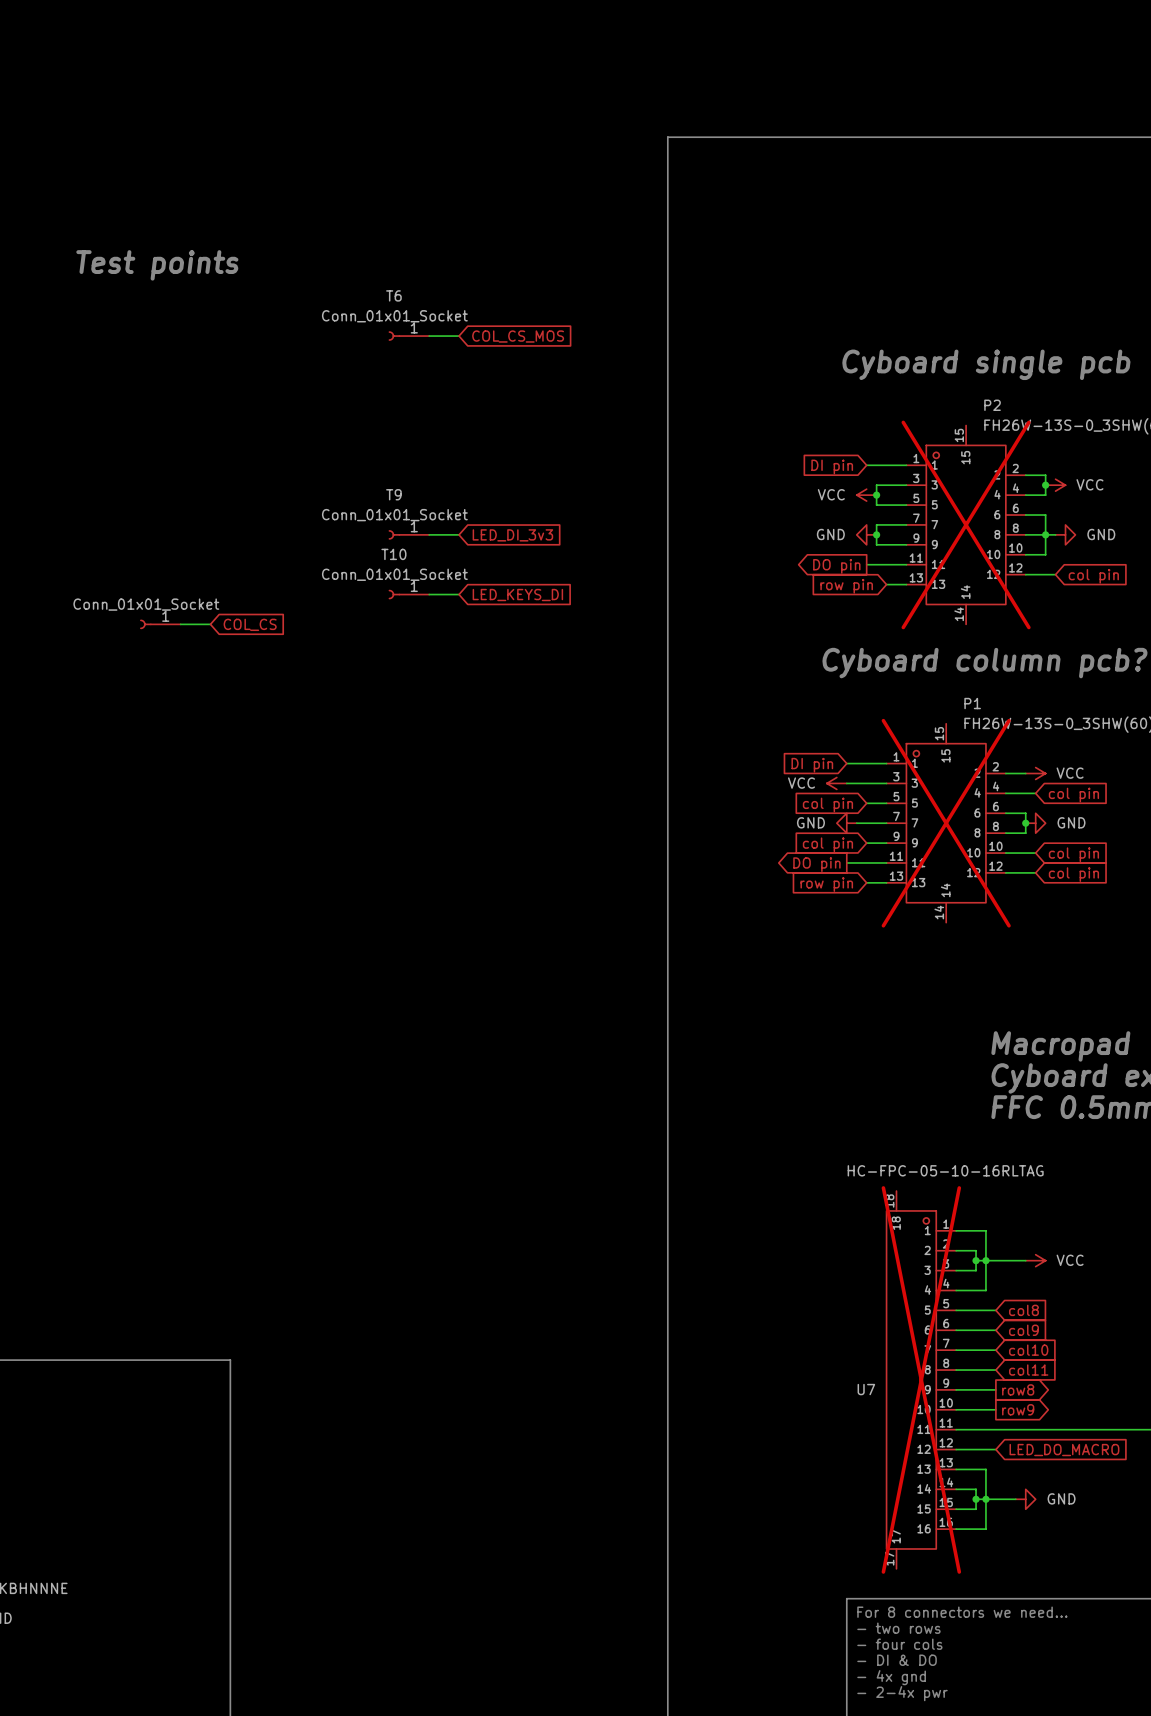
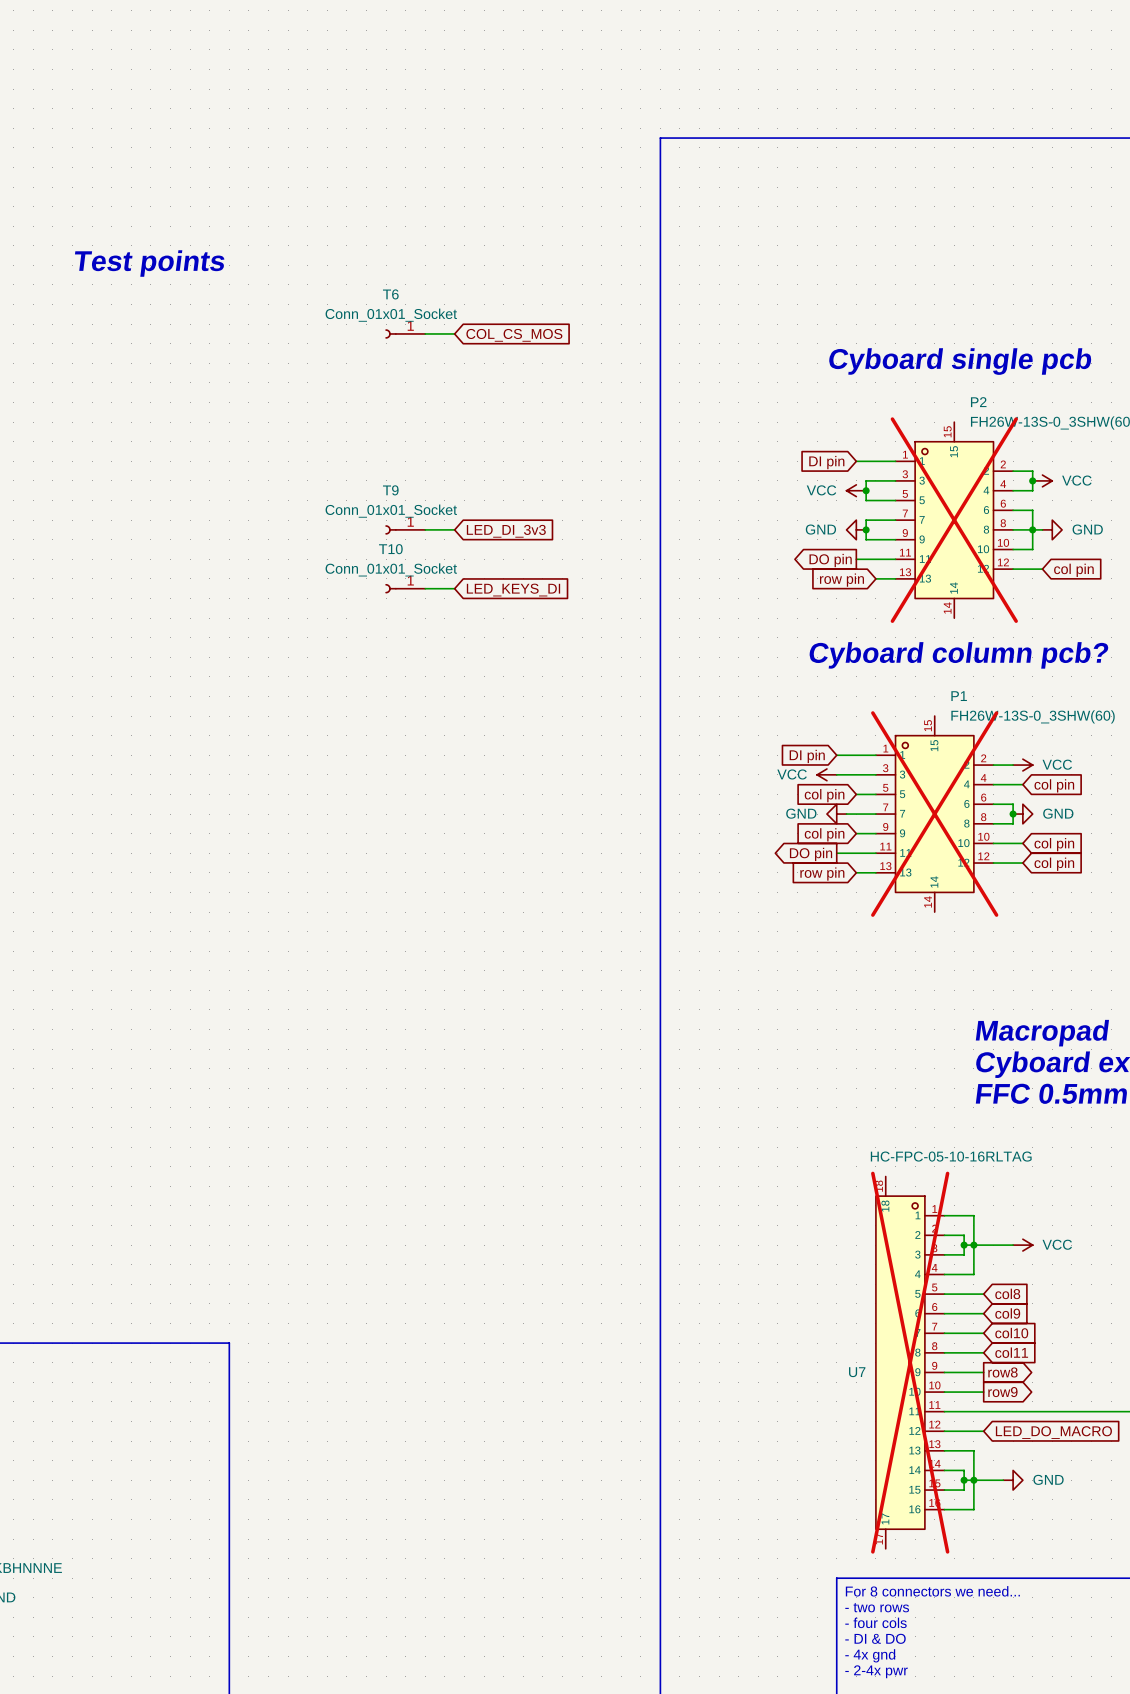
part: Conn_01x01_Socket (160, 624) -> none
wire: (180, 624) (210, 624) -> none
global label: COL_CS (250, 624) -> none

